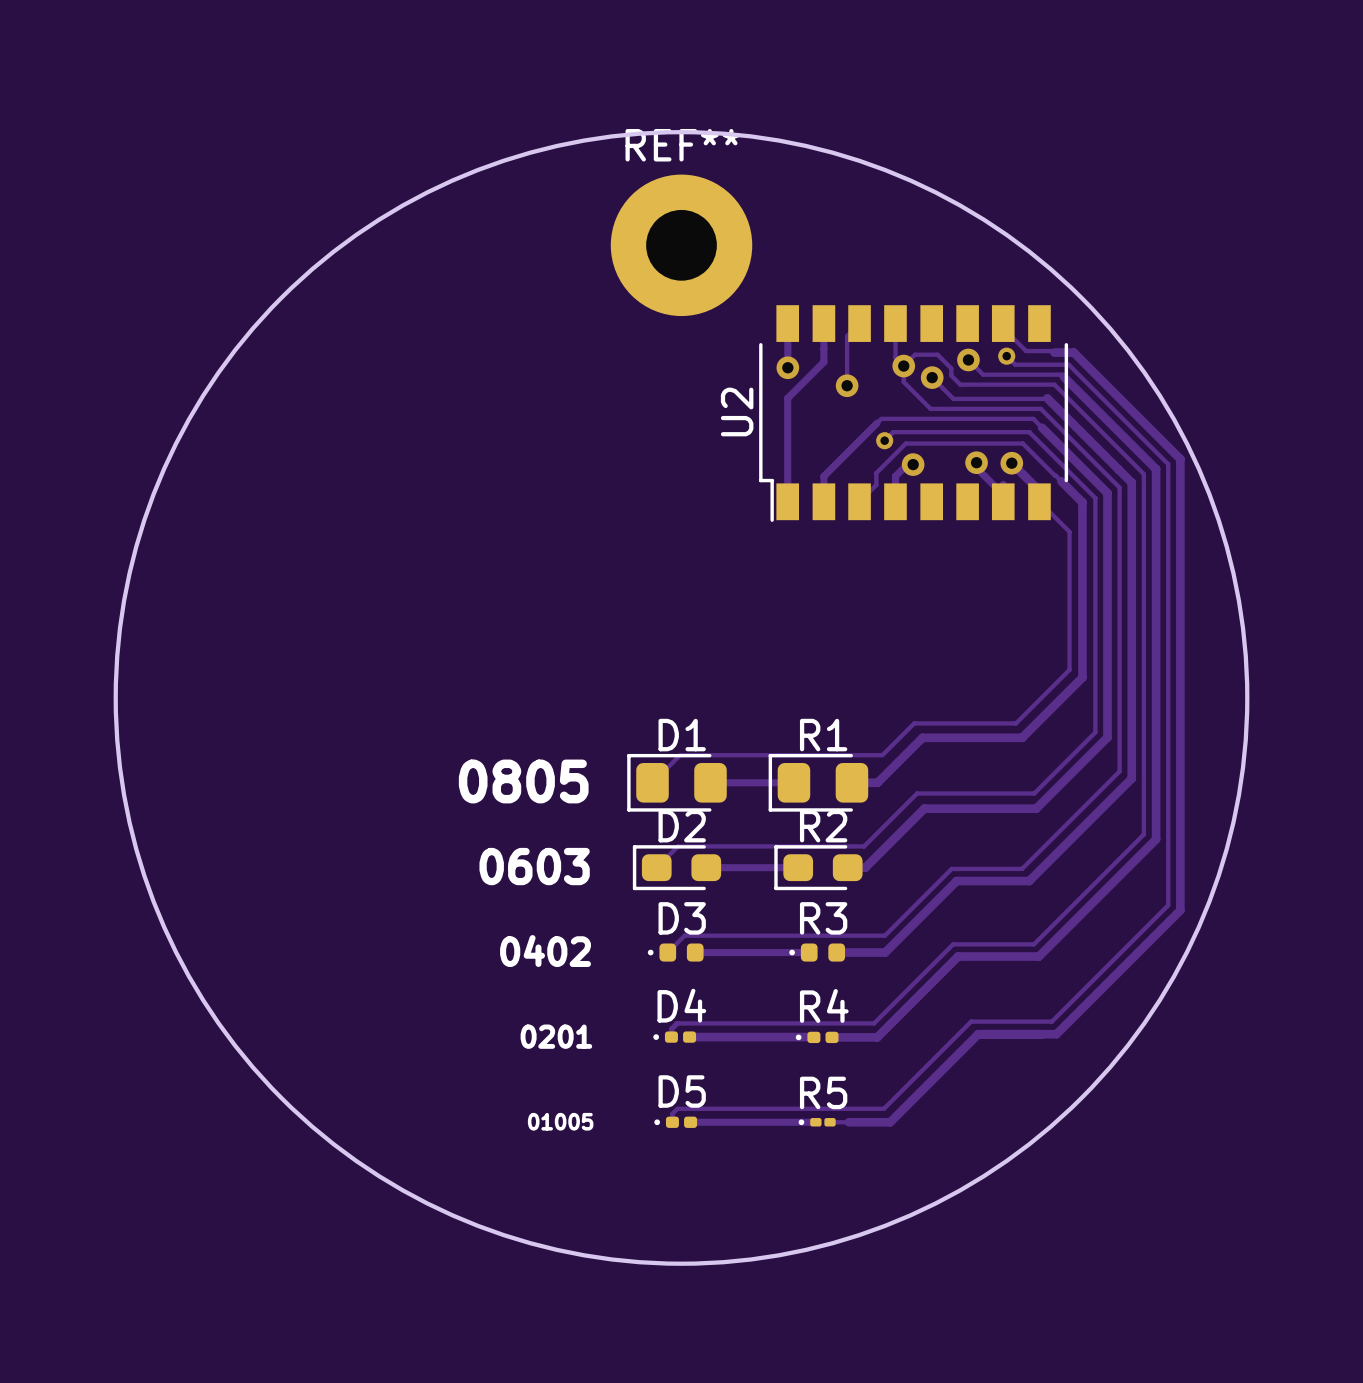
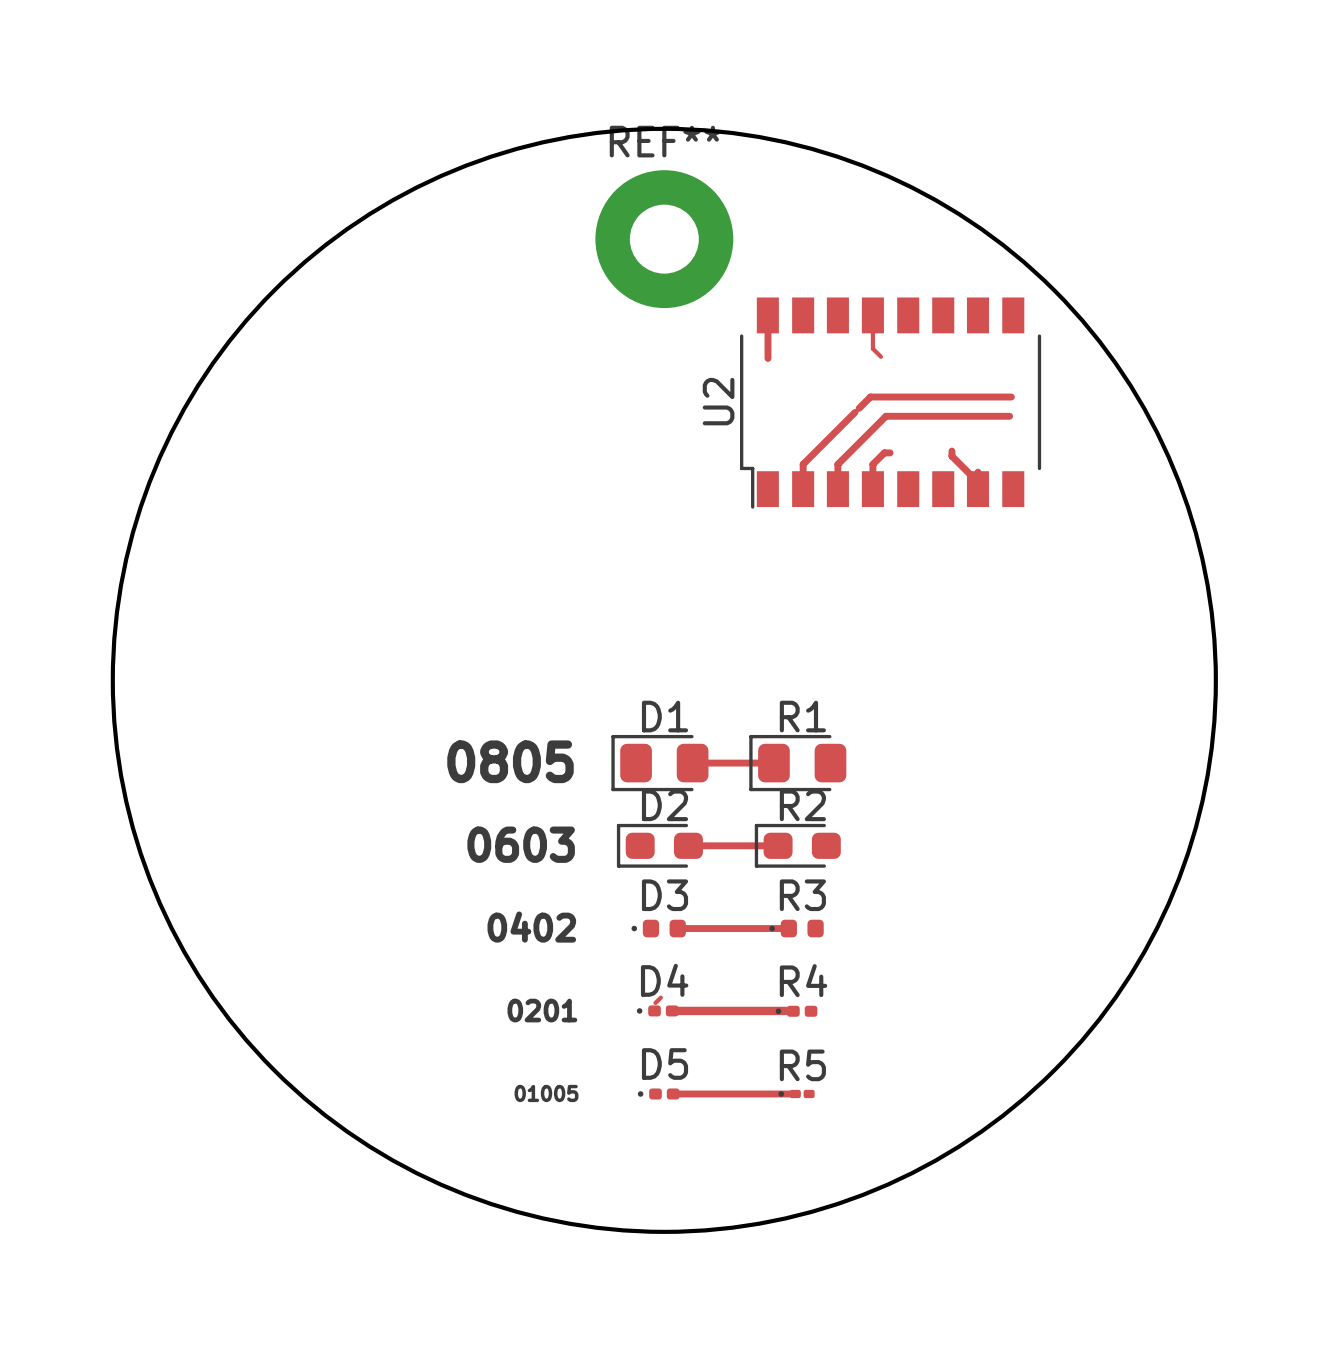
track: (823, 323) (823, 362) (787, 398) (787, 501) -> none
track: (859, 323) (847, 335) (847, 385) -> none
track: (1003, 323) (1003, 328) (1026, 351) (1073, 352) (1180, 459) (1180, 910) (1056, 1034) (978, 1034) (890, 1122) (830, 1122) -> none
track: (1006, 356) (1015, 364) (1068, 364) (1168, 464) (1168, 905) (1051, 1021) (971, 1021) (883, 1108) (677, 1108) (672, 1113) (672, 1122) -> none
via: (1006, 356) -> none
track: (968, 359) (983, 374) (1061, 374) (1156, 469) (1156, 839) (1038, 956) (958, 956) (877, 1037) (832, 1037) -> none
via: (968, 359) -> none
via: (903, 366) -> none
via: (787, 367) -> none
track: (932, 377) (953, 398) (1044, 398) -> none
via: (932, 377) -> none
via: (847, 385) -> none
track: (1047, 398) (1131, 482) (1131, 778) (1029, 881) (956, 881) (885, 952) (836, 952) -> none
track: (881, 418) (1033, 418) (1107, 493) (1107, 737) (1036, 808) (924, 808) (865, 867) (847, 867) -> (859, 408) (870, 397) (1011, 397)
track: (884, 440) (893, 432) (1029, 432) (1095, 498) (1095, 732) (1034, 793) (917, 793) (864, 846) (678, 846) (656, 867) (667, 878) -> none
via: (884, 440) -> none
via: (976, 462) -> none
track: (1011, 463) (1039, 490) (1039, 501) (1069, 531) (1069, 669) (1015, 723) (914, 723) (882, 755) (680, 755) (652, 782) -> none
via: (1011, 463) -> none
via: (913, 464) -> none
track: (859, 501) (876, 484) (876, 473) (905, 443) (1022, 443) (1082, 502) (1082, 677) (1022, 737) (922, 737) (877, 782) (851, 782) -> (837, 489) (837, 464) (885, 416) (1009, 416)
track: (672, 957) (667, 952) (684, 935) (884, 935) (951, 868) (1022, 868) (1119, 771) (1119, 487) (1040, 408) (930, 408) (903, 382) (903, 366) (915, 354) (937, 354) (951, 368) (951, 375) (960, 384) (1054, 384) (1143, 474) (1143, 834) (1033, 944) (953, 944) (874, 1023) (676, 1023) (671, 1028) (671, 1037) -> none

